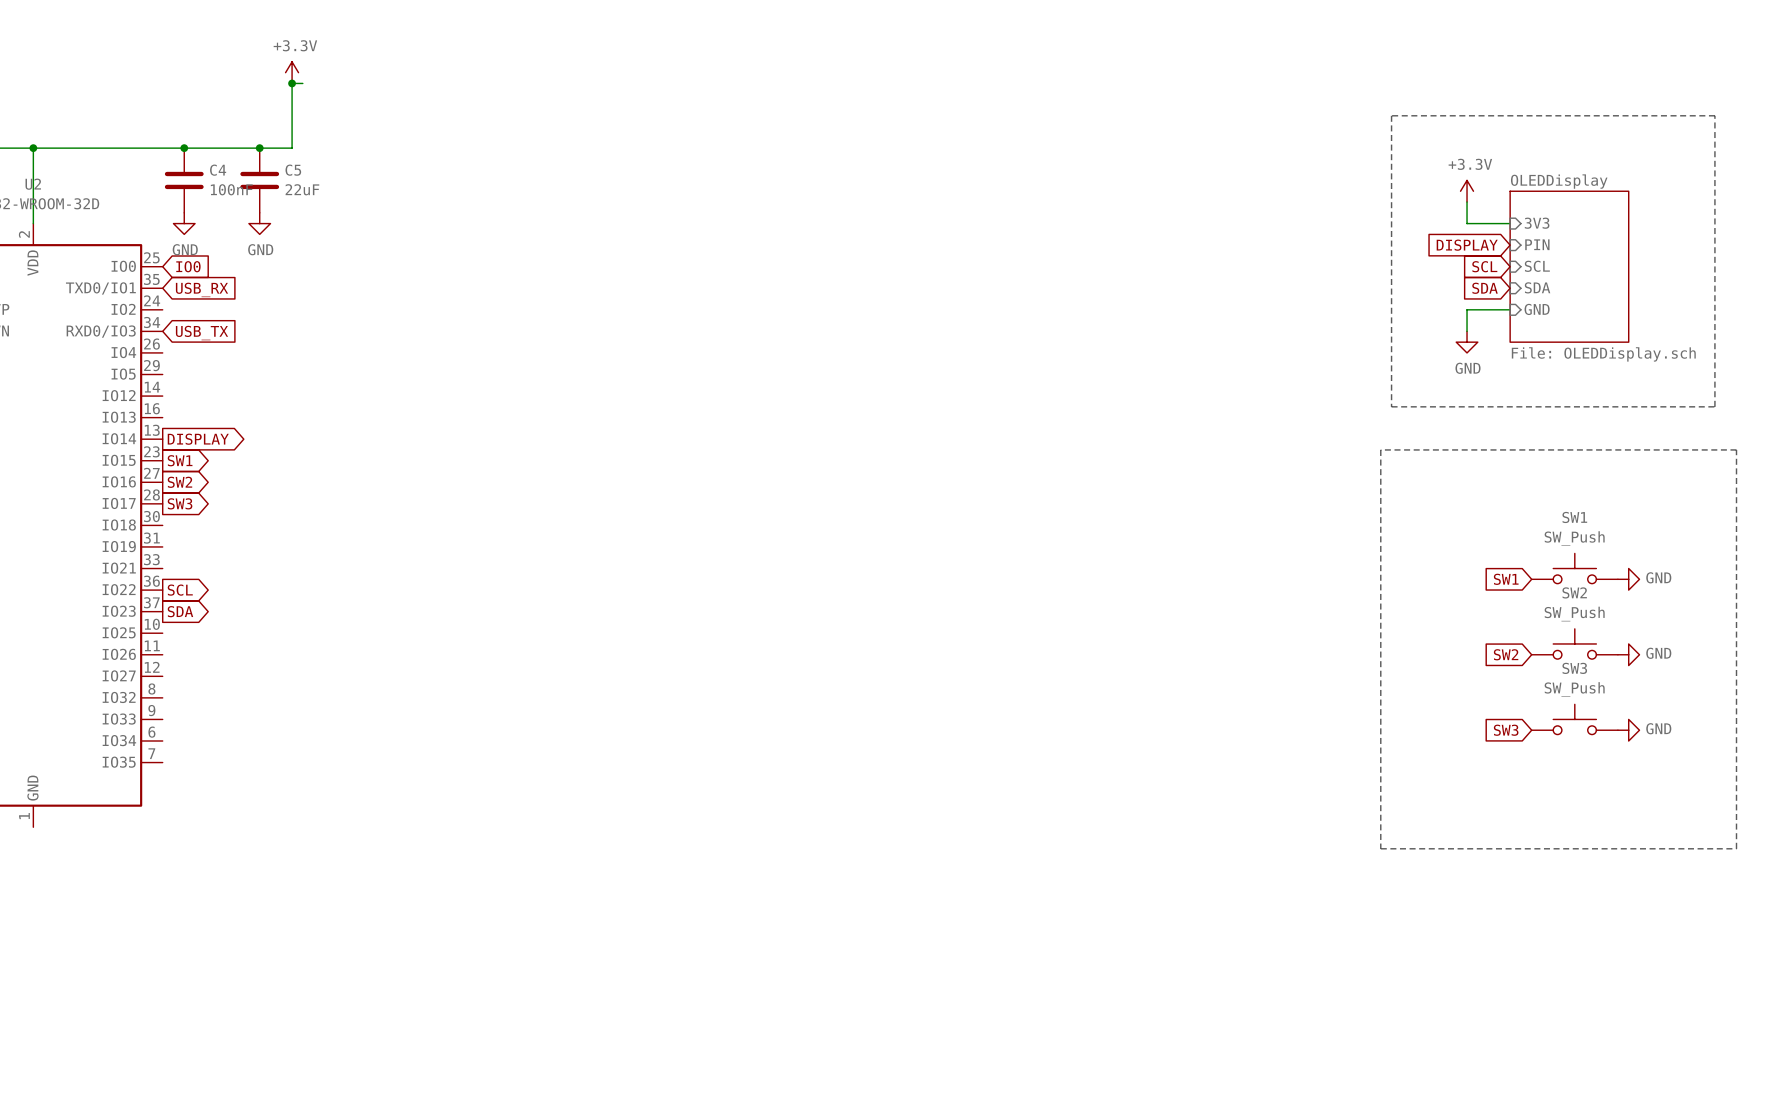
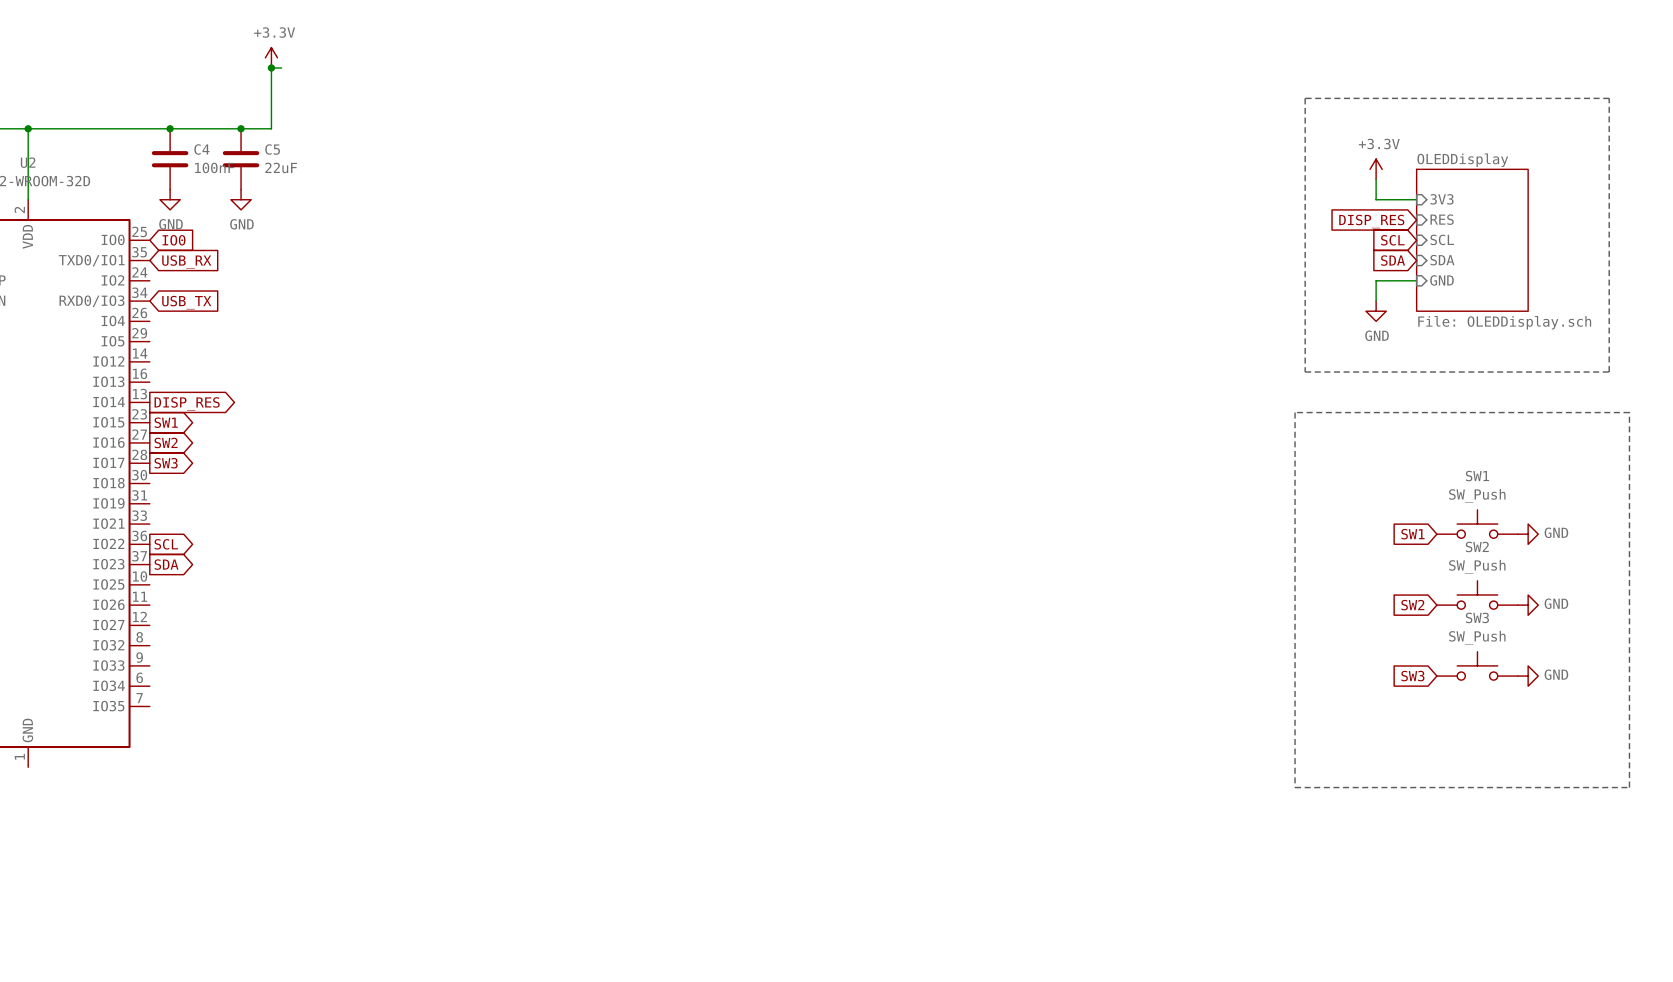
sheet pin: PIN (1537, 244) -> RES (1442, 219)
global label: DISPLAY (1467, 245) -> DISP_RES (1371, 221)
global label: DISPLAY (198, 439) -> DISP_RES (187, 403)

